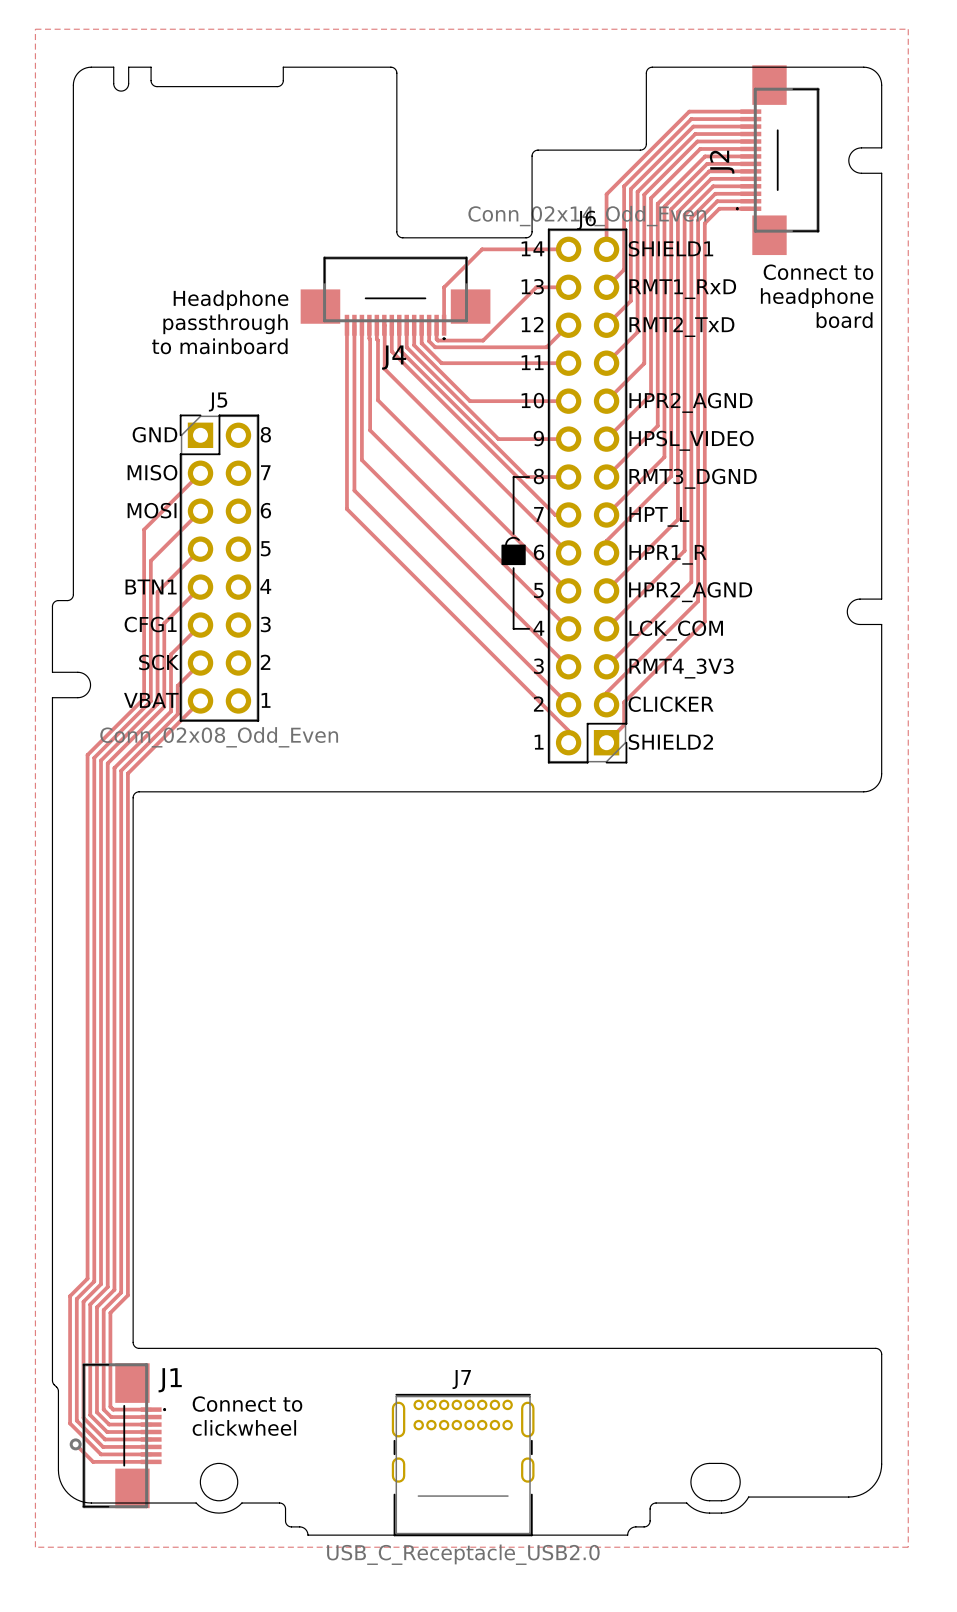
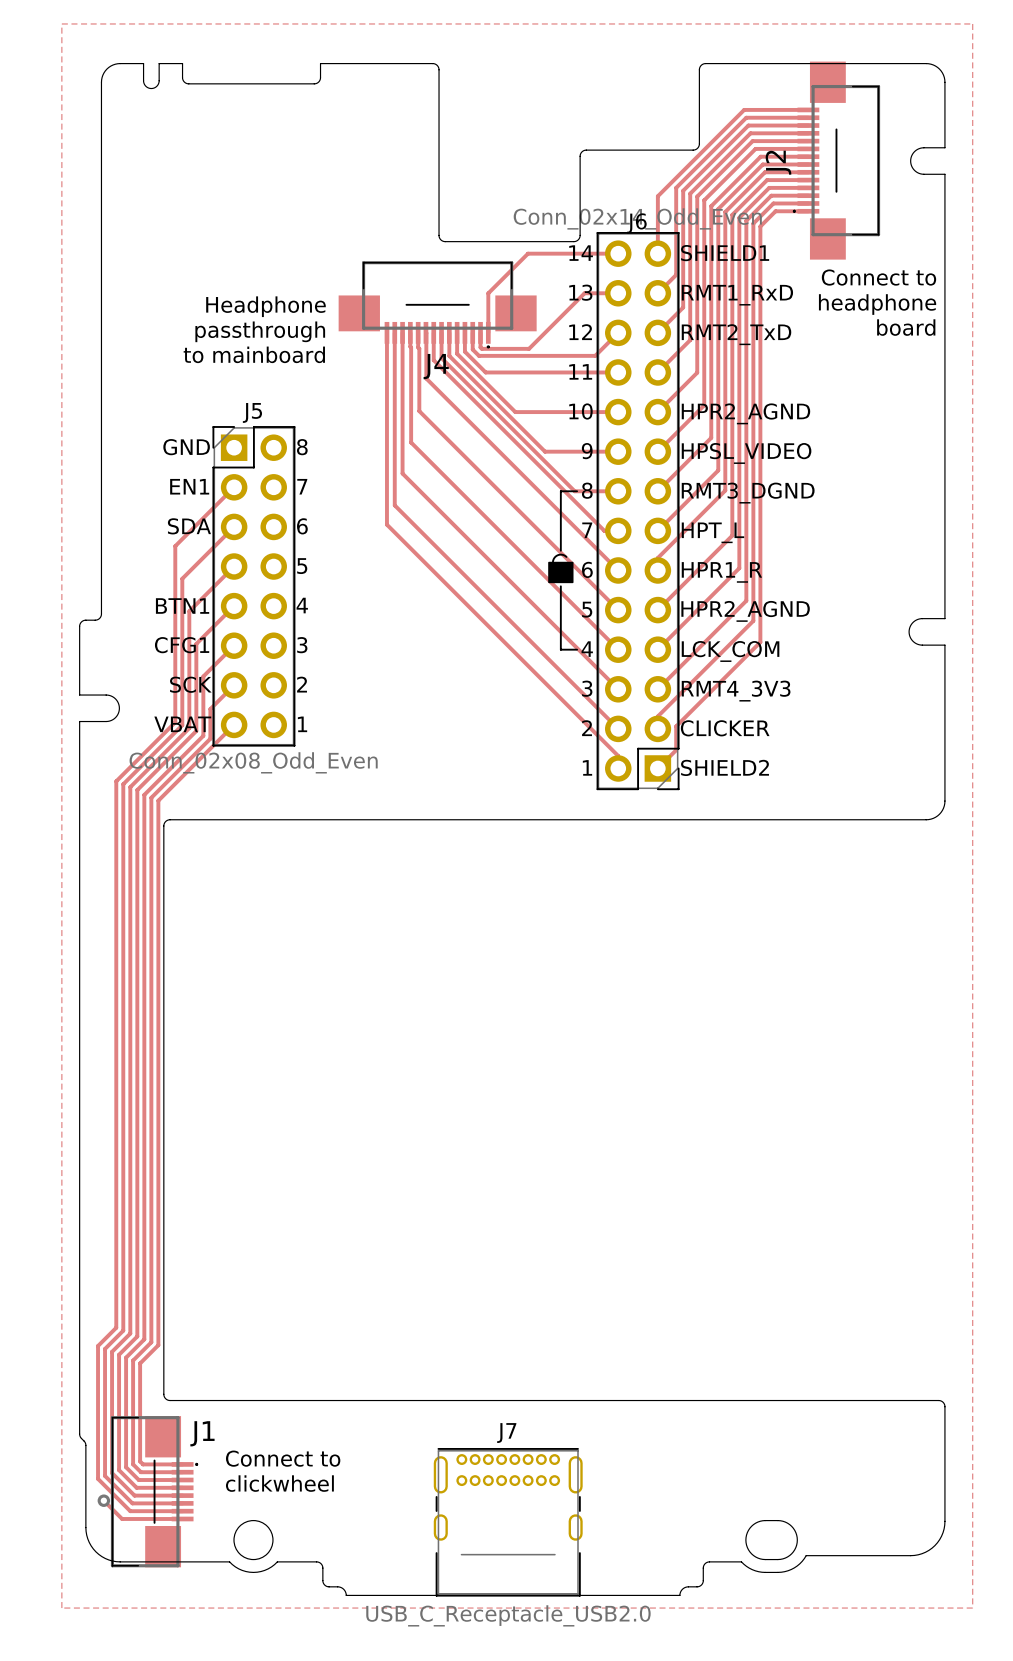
text: MISO (152, 472) -> EN1 (189, 486)
text: MOSI (152, 510) -> SDA (189, 526)

